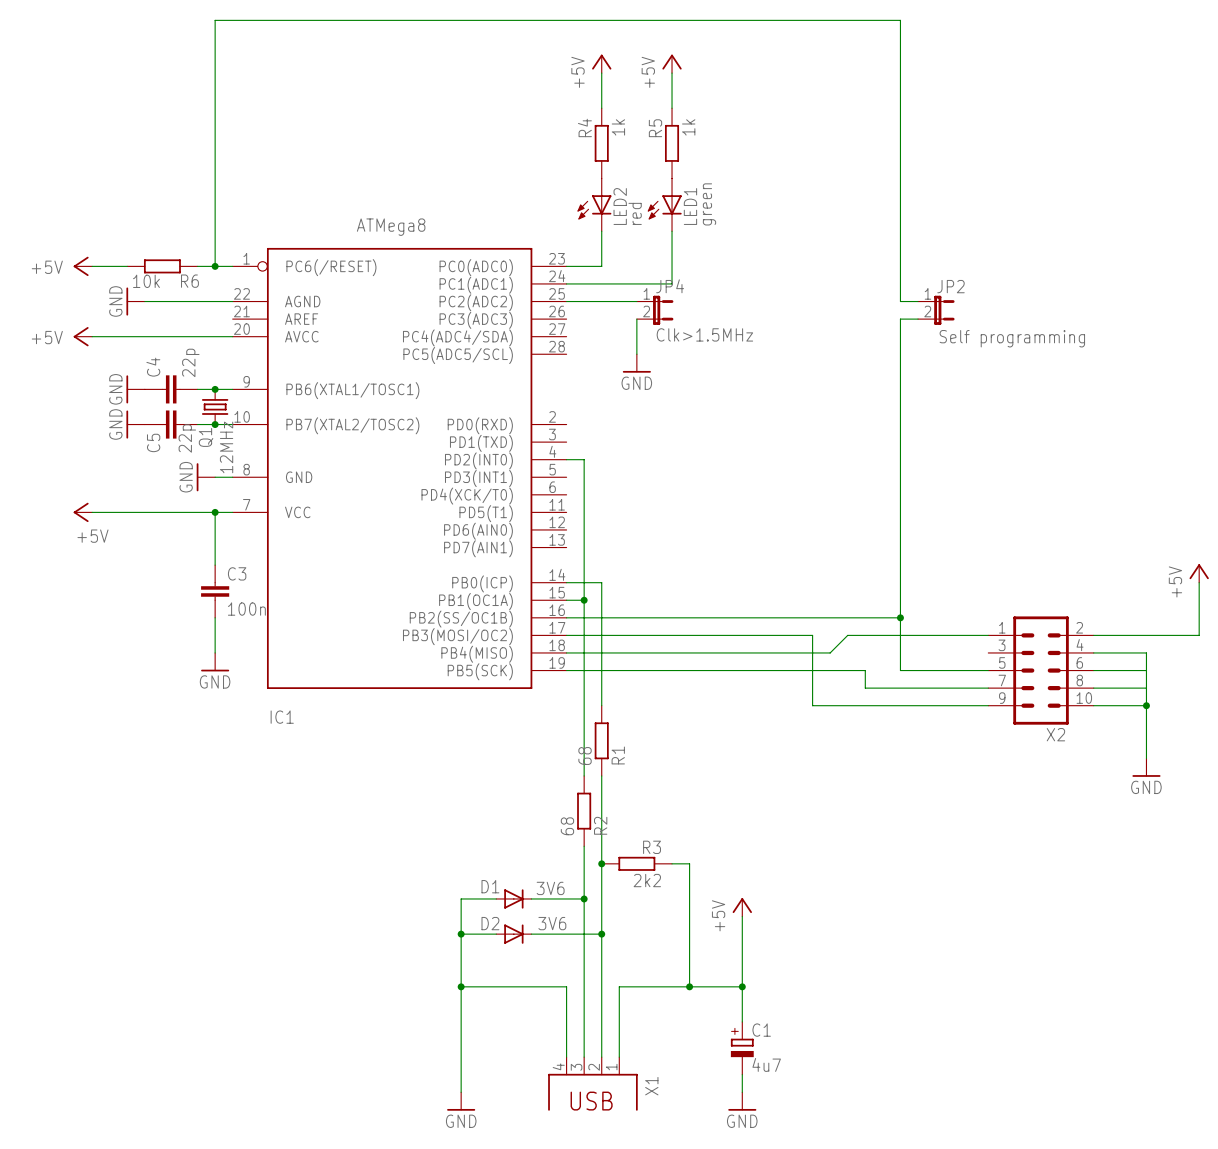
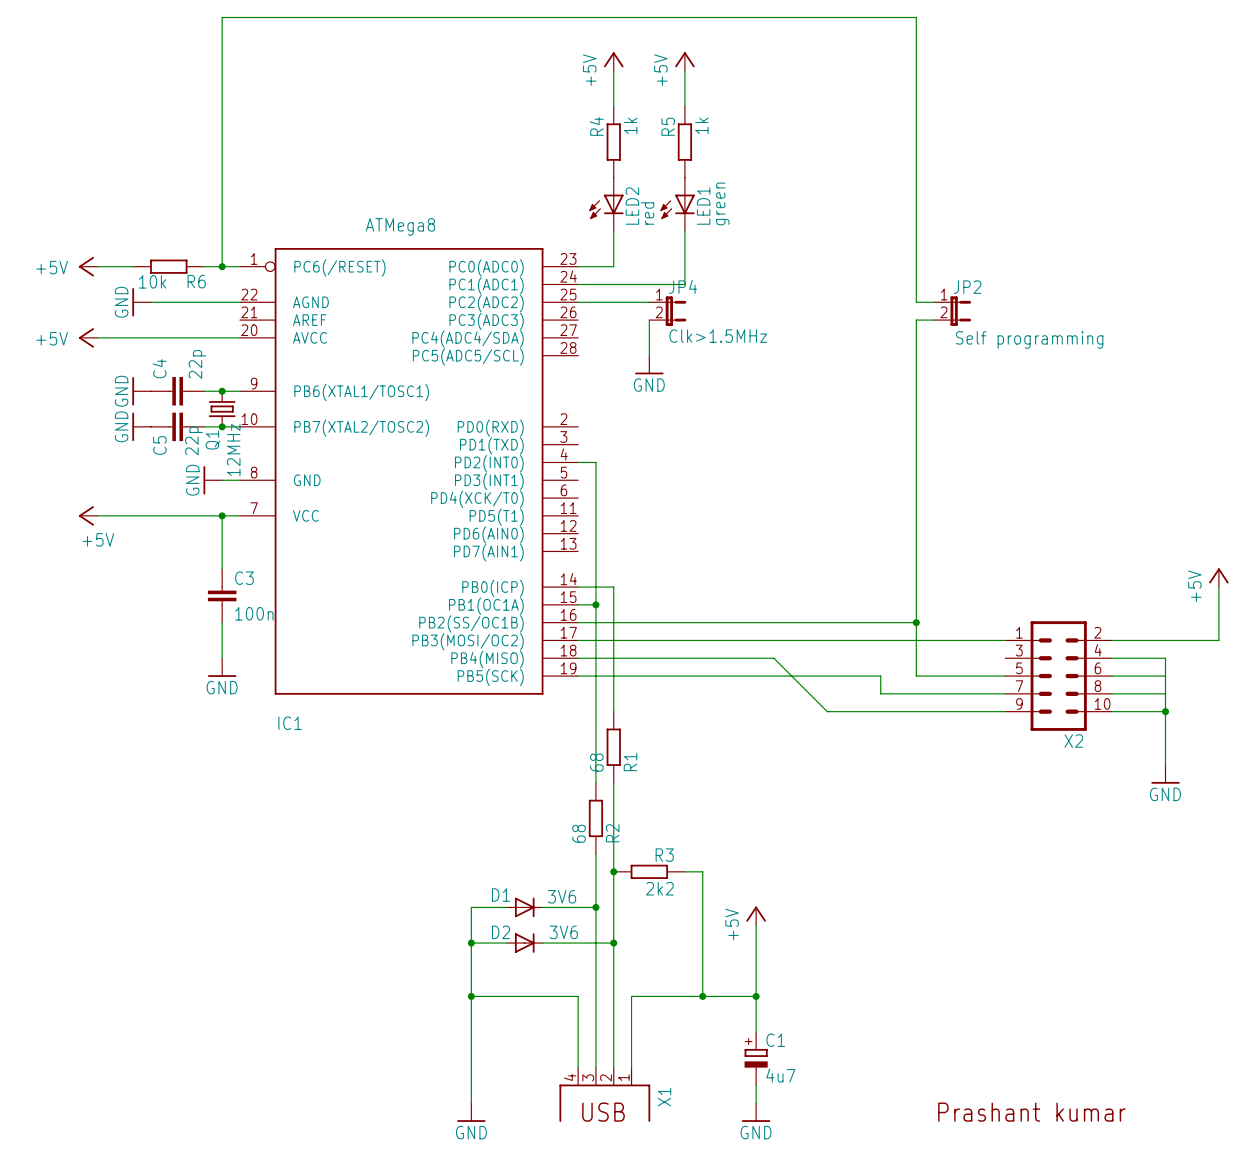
wire: (812, 635) (812, 705) -> (773, 658) (827, 711)
wire: (847, 635) (830, 652) (759, 652) -> (862, 640) (827, 640)
text: none -> Prashant kumar (1031, 1112)

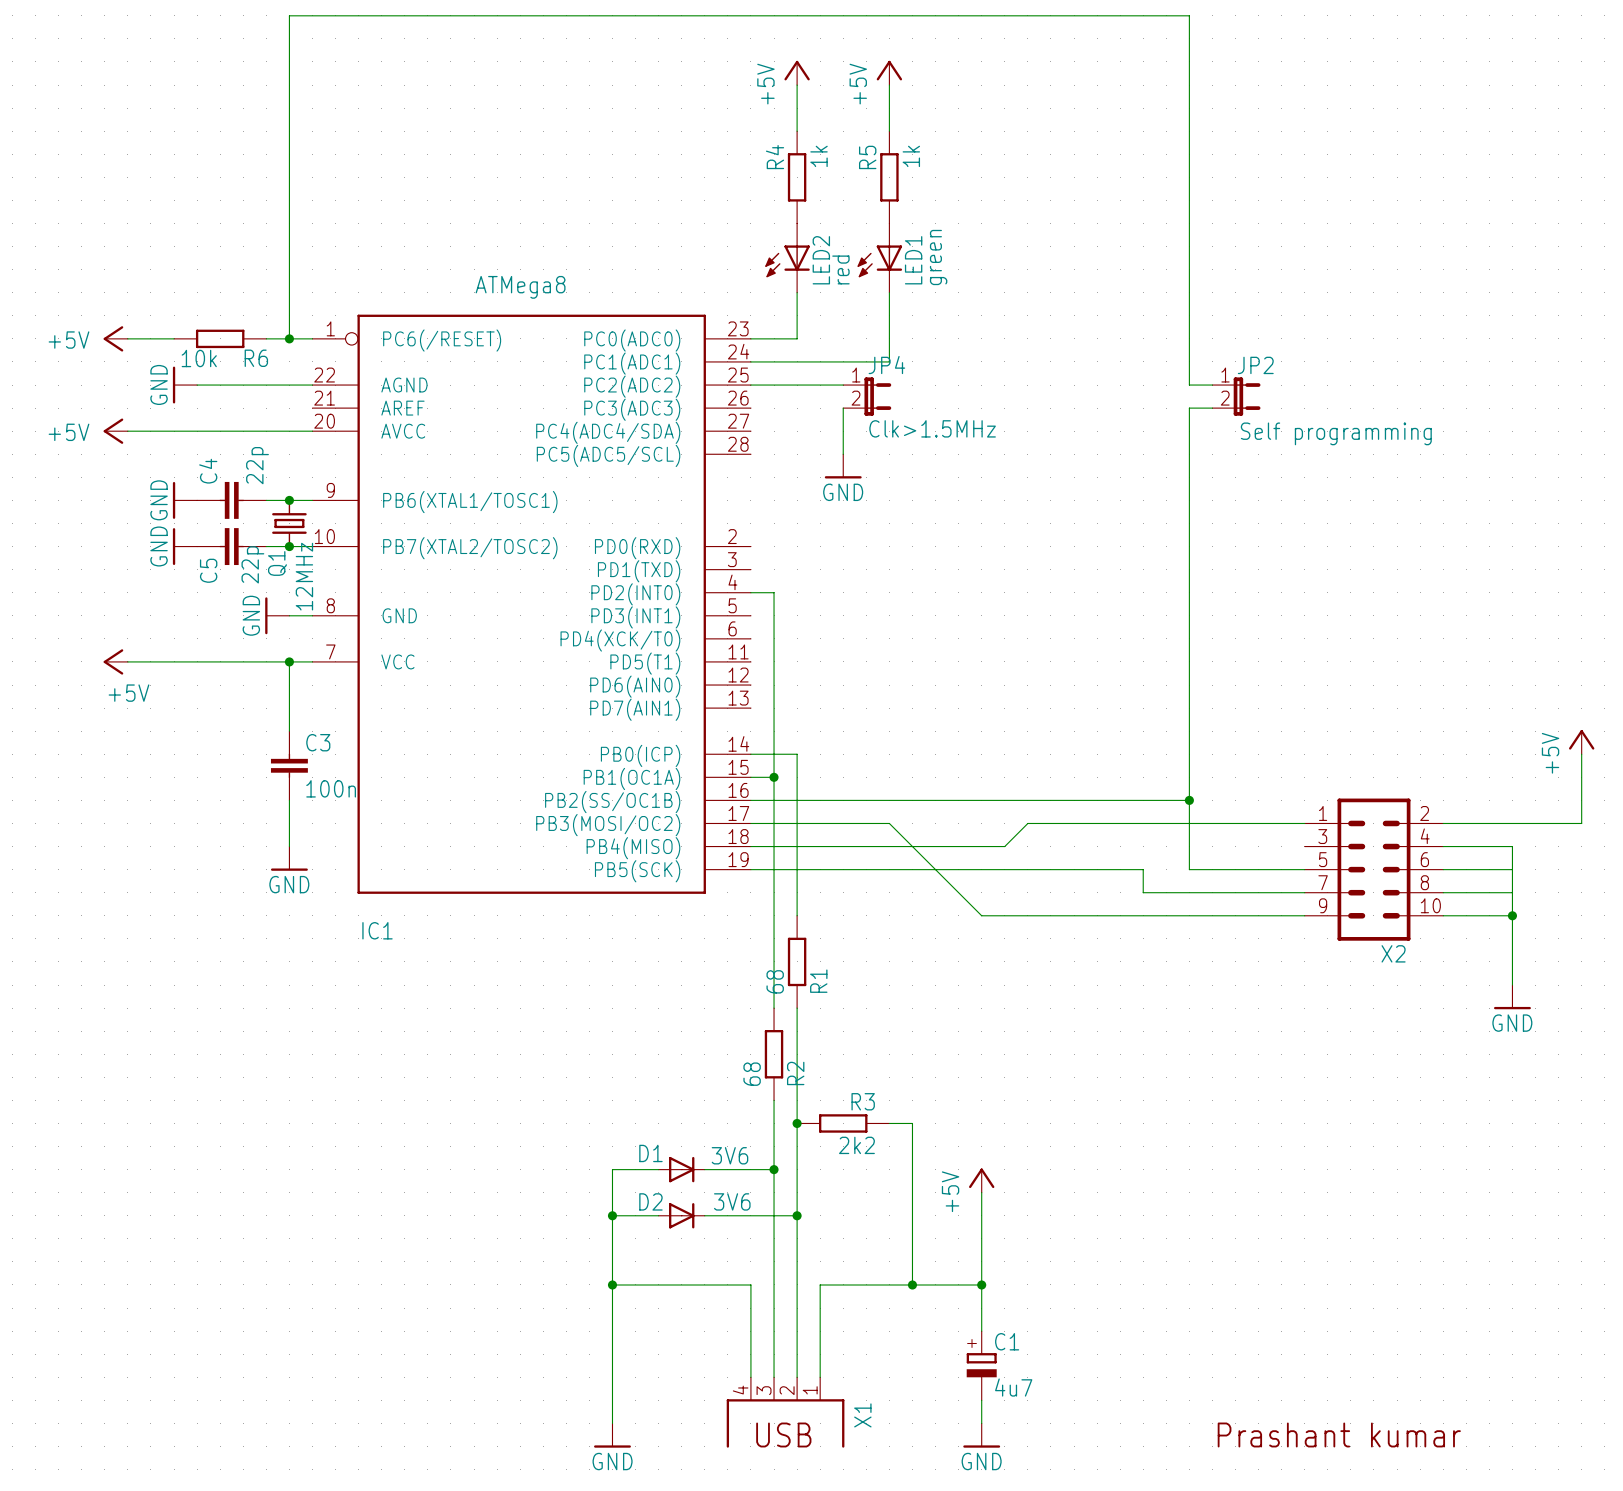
wire: (684, 640) (791, 640) -> (889, 823) (981, 915) (1074, 915)
wire: (773, 658) (827, 711) -> (1004, 846) (1027, 823)

